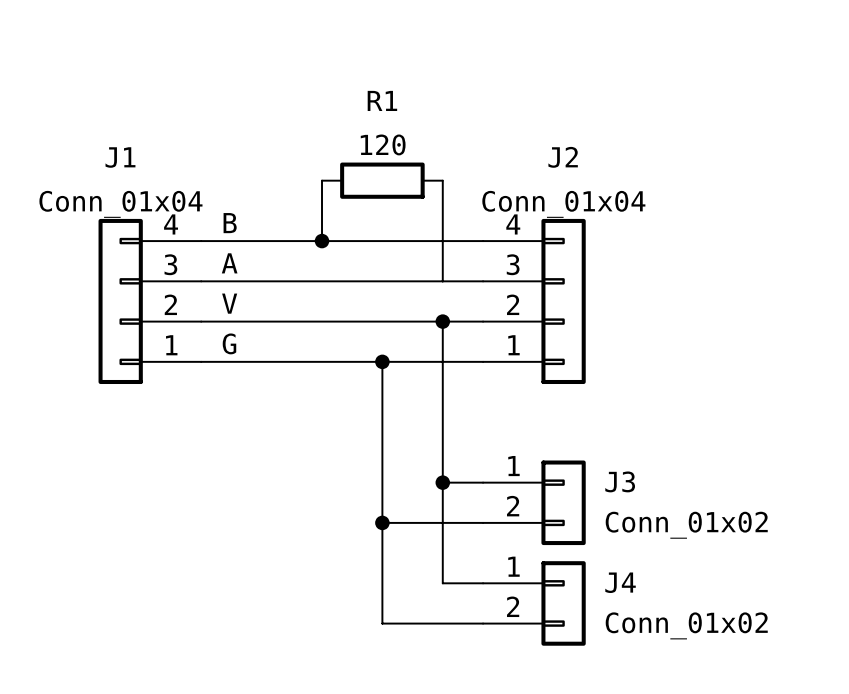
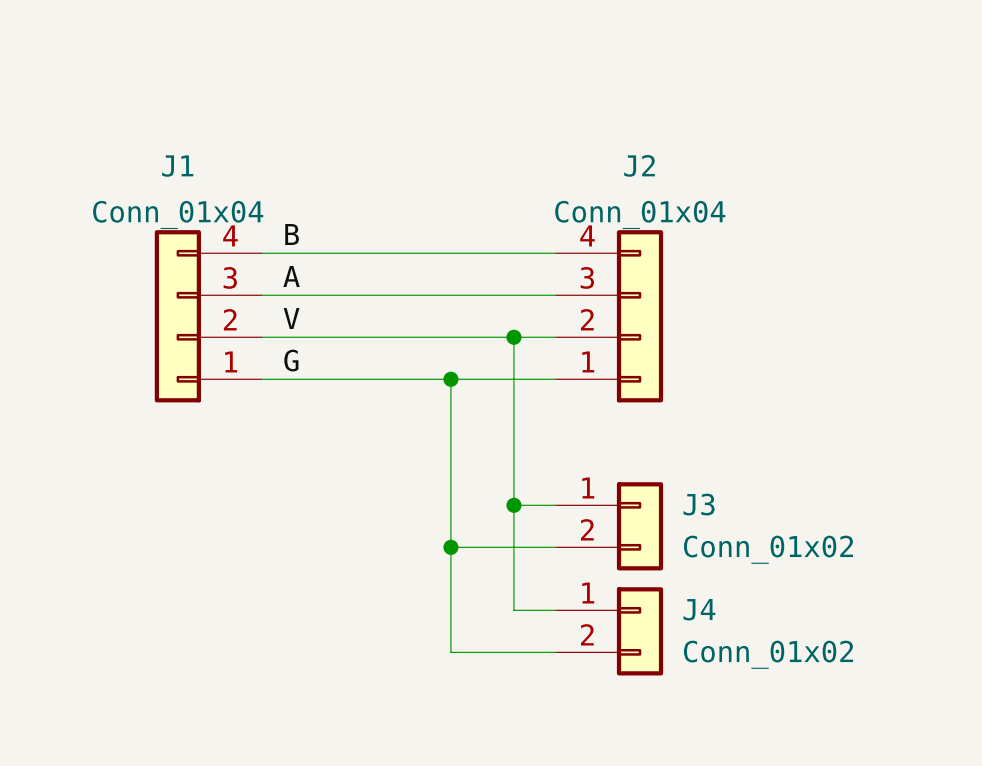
wire: (322, 180) (322, 241) -> none
R1: 120 (382, 180) -> none
wire: (442, 180) (442, 281) -> none
junction: (322, 241) -> none

